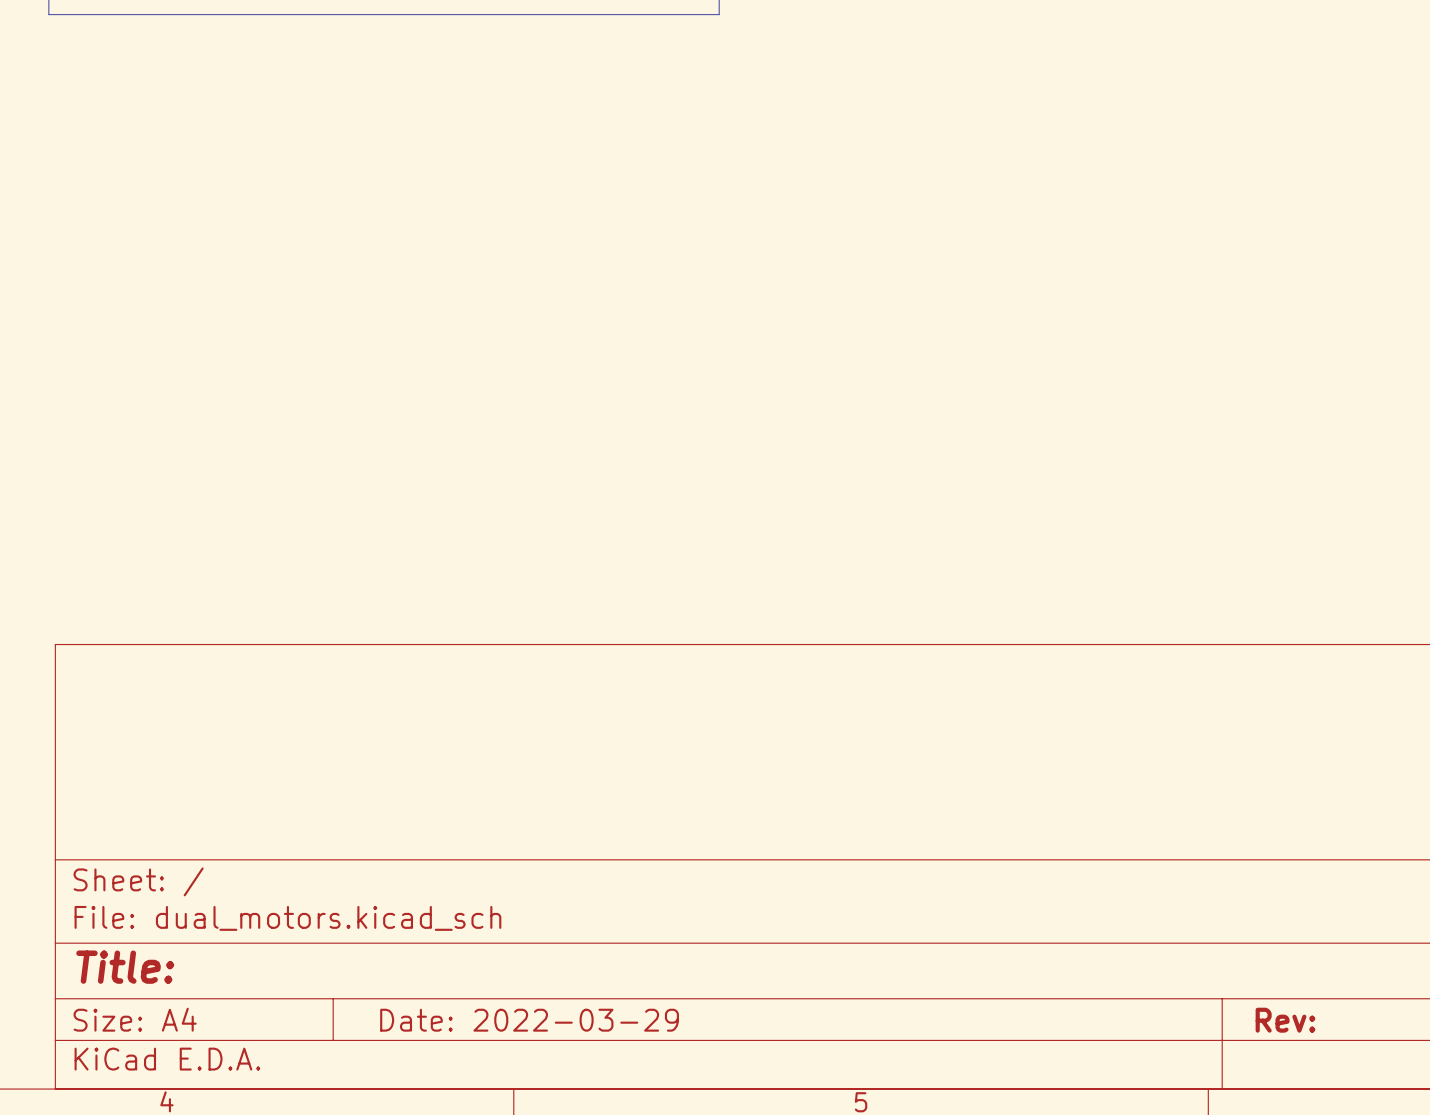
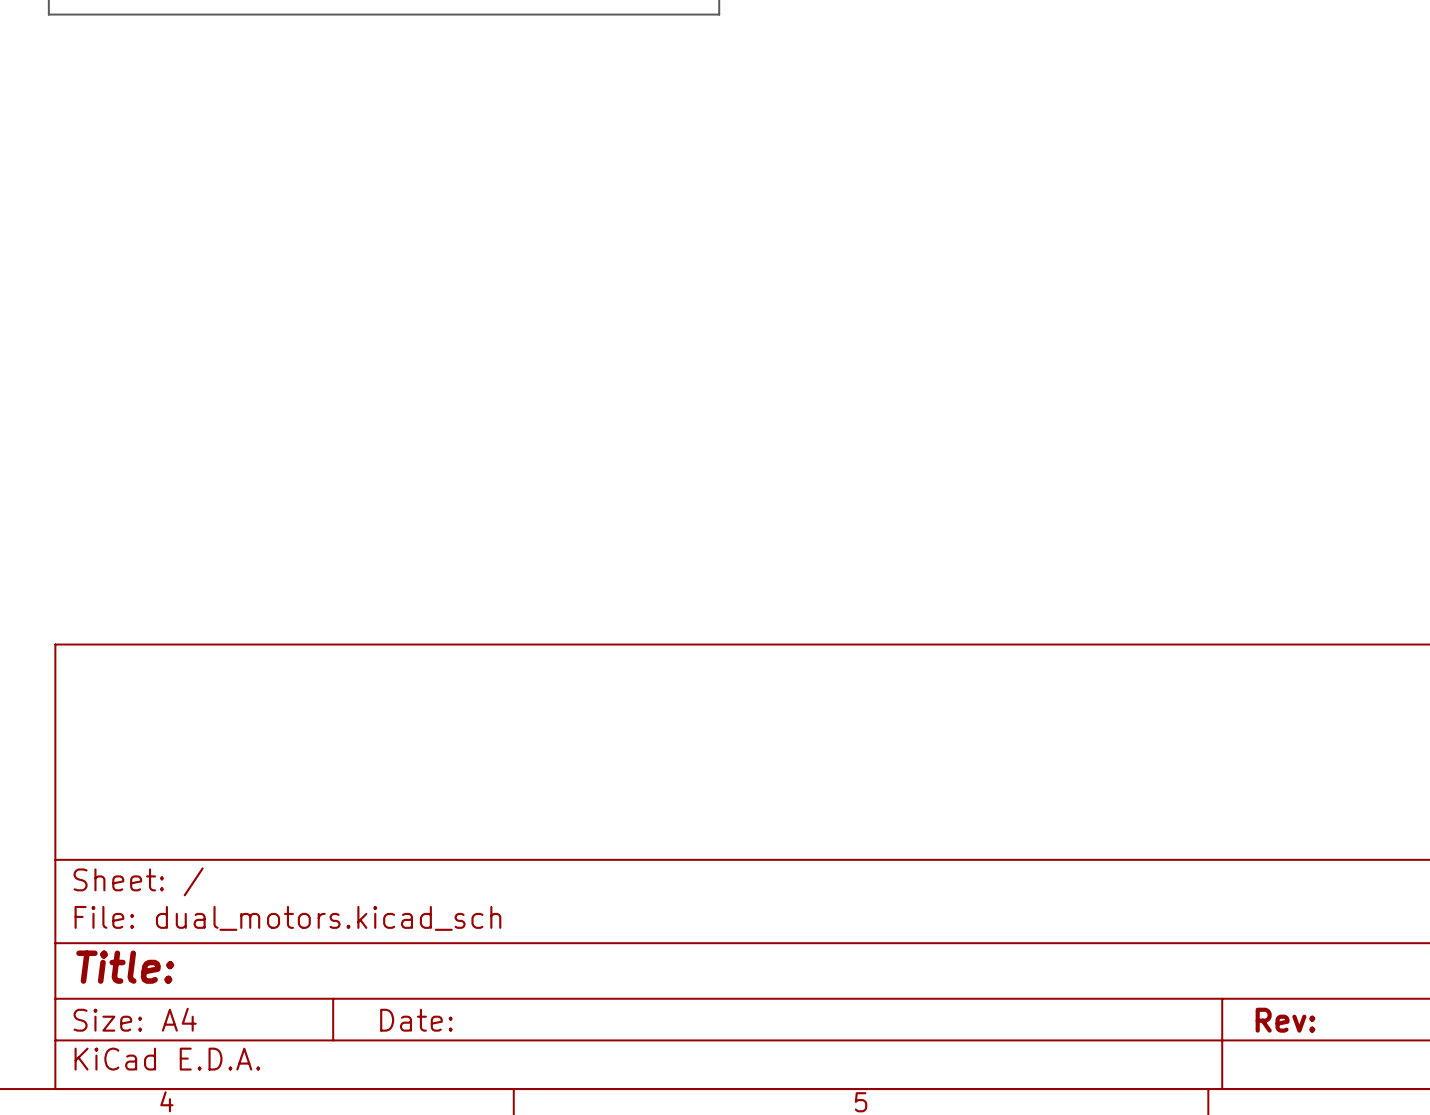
title block: Date: 2022-03-29 (529, 1020) -> Date: (416, 1020)

